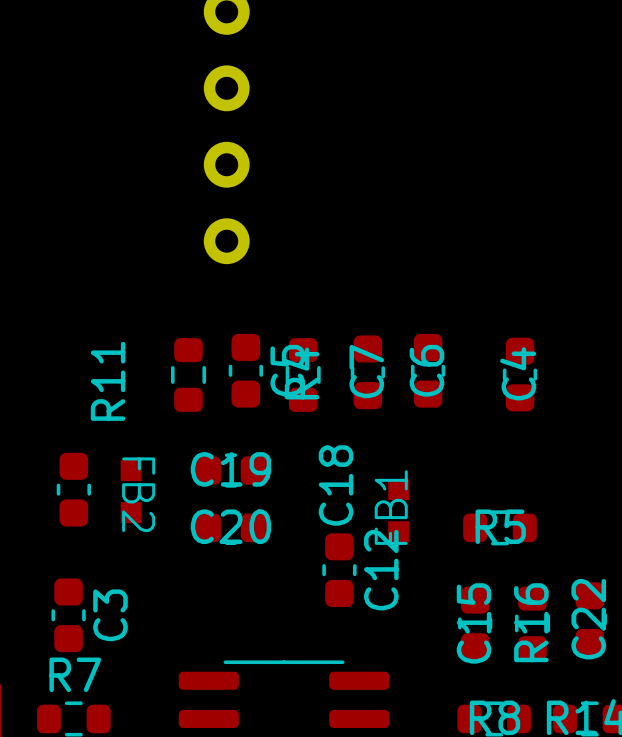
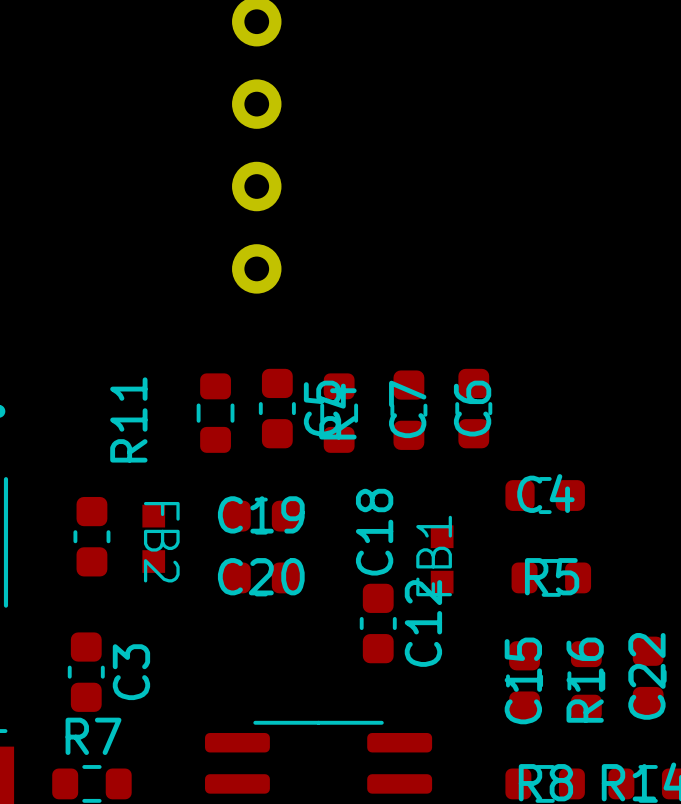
C4 rotation: 0° (520, 374) -> 90° clockwise (545, 495)
C4 position: (520, 374) -> (545, 495)

